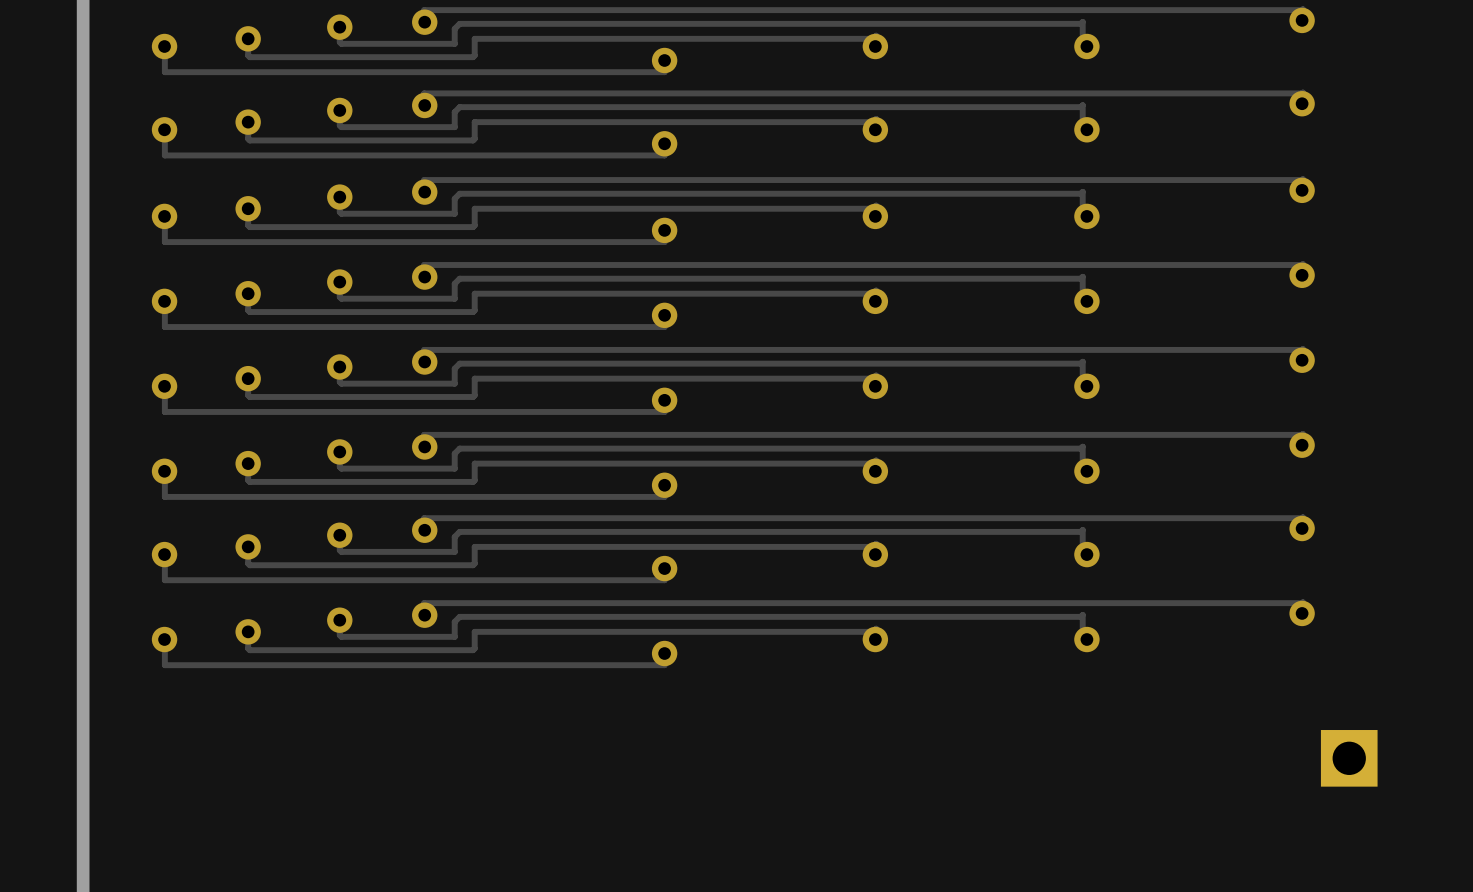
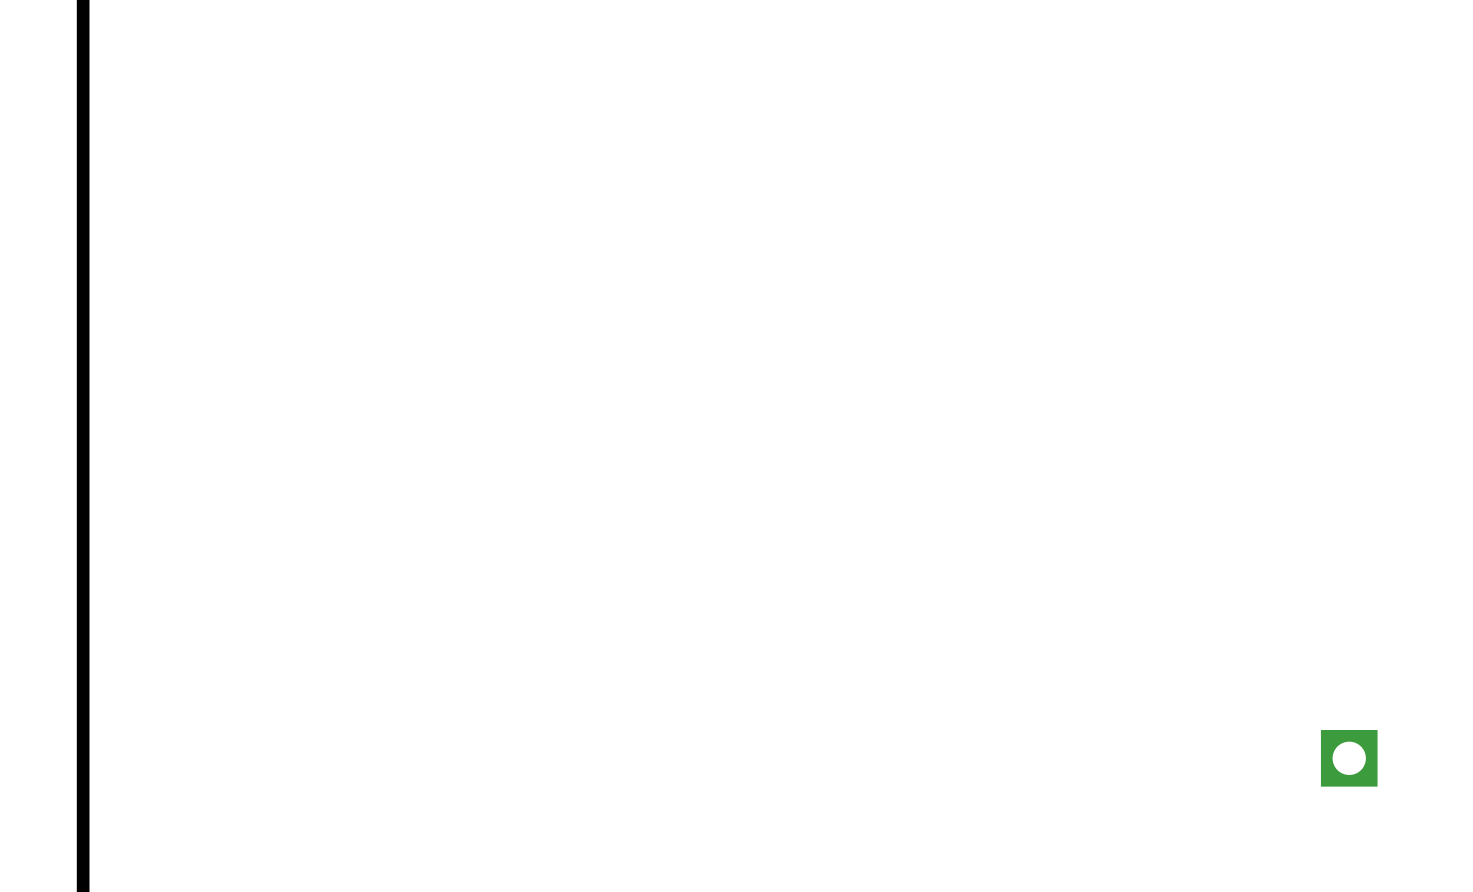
track: (1302, 20) (1303, 18) (1302, 9) (424, 10) (424, 22) -> none
via: (1302, 20) -> none
via: (424, 22) -> none
track: (339, 27) (341, 43) (454, 43) (454, 28) (459, 23) (1080, 23) (1082, 21) (1082, 42) (1086, 46) -> none
via: (339, 27) -> none
track: (248, 38) (248, 55) (249, 57) (473, 57) (474, 55) (474, 38) (873, 38) (876, 35) (875, 46) -> none
via: (248, 38) -> none
track: (164, 46) (164, 72) (664, 72) (664, 60) -> none
via: (164, 46) -> none
via: (875, 46) -> none
via: (1086, 46) -> none
via: (664, 60) -> none
track: (1302, 103) (1303, 102) (1302, 92) (424, 93) (424, 105) -> none
via: (1302, 103) -> none
via: (424, 105) -> none
track: (339, 110) (341, 127) (454, 127) (454, 112) (459, 107) (1080, 107) (1082, 105) (1082, 125) (1086, 129) -> none
via: (339, 110) -> none
track: (248, 122) (248, 138) (249, 140) (473, 140) (474, 138) (474, 122) (873, 122) (876, 118) (875, 129) -> none
via: (248, 122) -> none
via: (164, 129) -> none
via: (875, 129) -> none
via: (1086, 129) -> none
track: (164, 130) (164, 155) (664, 155) (664, 143) -> none
via: (664, 143) -> none
track: (1302, 190) (1303, 188) (1302, 179) (424, 180) (424, 192) -> none
via: (1302, 190) -> none
via: (424, 192) -> none
track: (339, 197) (341, 213) (454, 213) (454, 198) (459, 193) (1080, 193) (1082, 191) (1082, 212) (1086, 216) -> none
via: (339, 197) -> none
track: (248, 208) (248, 225) (249, 227) (473, 227) (474, 225) (474, 208) (873, 208) (876, 205) (875, 216) -> none
via: (248, 208) -> none
track: (164, 216) (164, 242) (664, 242) (664, 230) -> none
via: (164, 216) -> none
via: (875, 216) -> none
via: (1086, 216) -> none
via: (664, 230) -> none
track: (1302, 275) (1303, 273) (1302, 264) (424, 264) (424, 277) -> none
via: (1302, 275) -> none
via: (424, 277) -> none
track: (339, 282) (341, 298) (454, 298) (454, 283) (459, 278) (1080, 278) (1082, 276) (1082, 297) (1086, 301) -> none
via: (339, 282) -> none
track: (248, 293) (248, 310) (249, 312) (473, 312) (474, 310) (474, 293) (873, 293) (876, 290) (875, 301) -> none
via: (248, 293) -> none
track: (164, 301) (164, 327) (664, 327) (664, 315) -> none
via: (164, 301) -> none
via: (875, 301) -> none
via: (1086, 301) -> none
via: (664, 315) -> none
track: (1302, 360) (1303, 358) (1302, 349) (424, 349) (424, 362) -> none
via: (1302, 360) -> none
via: (424, 362) -> none
track: (339, 367) (341, 383) (454, 383) (454, 368) (459, 363) (1080, 363) (1082, 361) (1082, 382) (1086, 386) -> none
via: (339, 367) -> none
track: (248, 378) (248, 395) (249, 396) (473, 396) (474, 395) (474, 378) (873, 378) (876, 375) (875, 386) -> none
via: (248, 378) -> none
track: (164, 386) (164, 411) (664, 411) (664, 400) -> none
via: (164, 386) -> none
via: (875, 386) -> none
via: (1086, 386) -> none
via: (664, 400) -> none
track: (1302, 445) (1303, 443) (1302, 434) (424, 434) (424, 446) -> none
via: (1302, 445) -> none
via: (424, 446) -> none
track: (339, 451) (341, 468) (454, 468) (454, 453) (459, 448) (1080, 448) (1082, 446) (1082, 467) (1086, 471) -> none
via: (339, 451) -> none
track: (248, 463) (248, 480) (249, 481) (473, 481) (474, 480) (474, 463) (873, 463) (876, 460) (875, 471) -> none
via: (248, 463) -> none
track: (164, 471) (164, 496) (664, 496) (664, 485) -> none
via: (164, 471) -> none
via: (875, 471) -> none
via: (1086, 471) -> none
via: (664, 485) -> none
track: (1302, 528) (1303, 526) (1302, 517) (424, 518) (424, 530) -> none
via: (1302, 528) -> none
via: (424, 530) -> none
track: (339, 535) (341, 551) (454, 551) (454, 536) (459, 531) (1080, 531) (1082, 530) (1082, 550) (1086, 554) -> none
via: (339, 535) -> none
track: (248, 546) (248, 563) (249, 565) (473, 565) (474, 563) (474, 546) (873, 546) (876, 543) (875, 554) -> none
via: (248, 546) -> none
track: (164, 554) (164, 580) (664, 580) (664, 568) -> none
via: (164, 554) -> none
via: (875, 554) -> none
via: (1086, 554) -> none
via: (664, 568) -> none
track: (1302, 613) (1303, 611) (1302, 602) (424, 603) (424, 615) -> none
via: (1302, 613) -> none
via: (424, 615) -> none
track: (339, 620) (341, 636) (454, 636) (454, 621) (459, 616) (1080, 616) (1082, 614) (1082, 635) (1086, 639) -> none
via: (339, 620) -> none
track: (248, 631) (248, 648) (249, 650) (473, 650) (474, 648) (474, 631) (873, 631) (876, 628) (875, 639) -> none
via: (248, 631) -> none
track: (164, 639) (164, 665) (664, 665) (664, 653) -> none
via: (164, 639) -> none
via: (875, 639) -> none
via: (1086, 639) -> none
via: (664, 653) -> none

